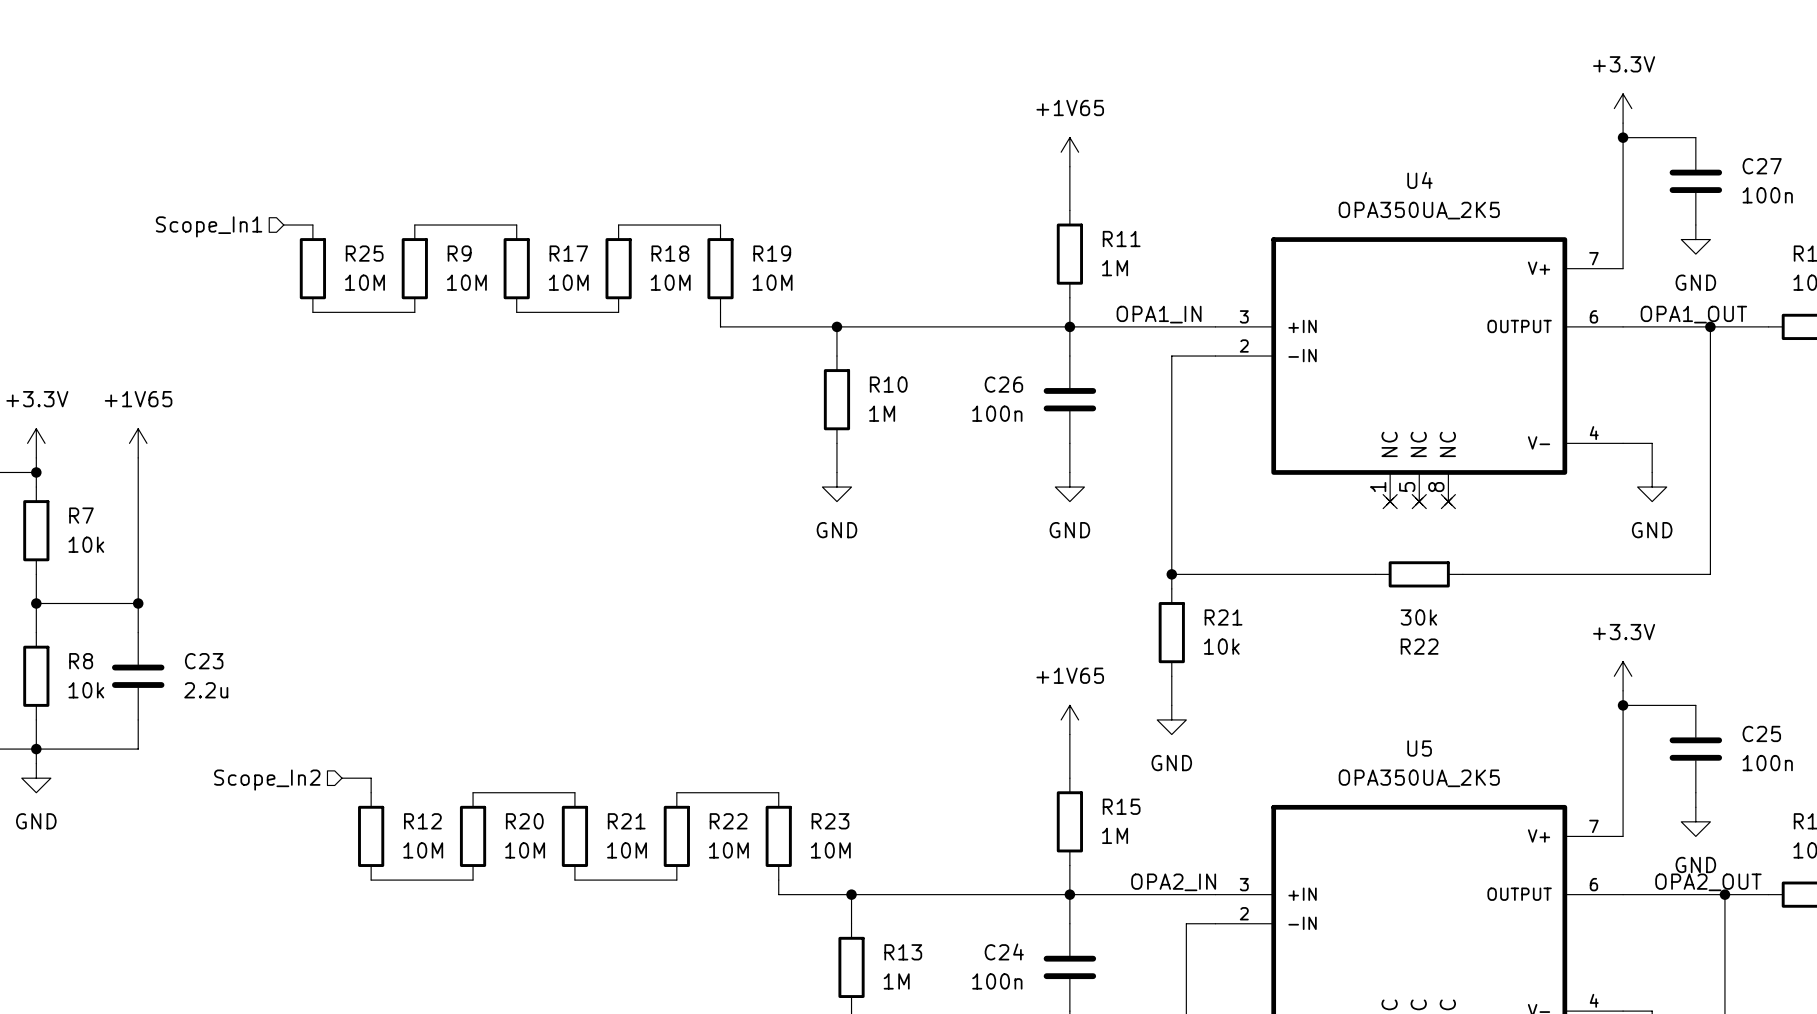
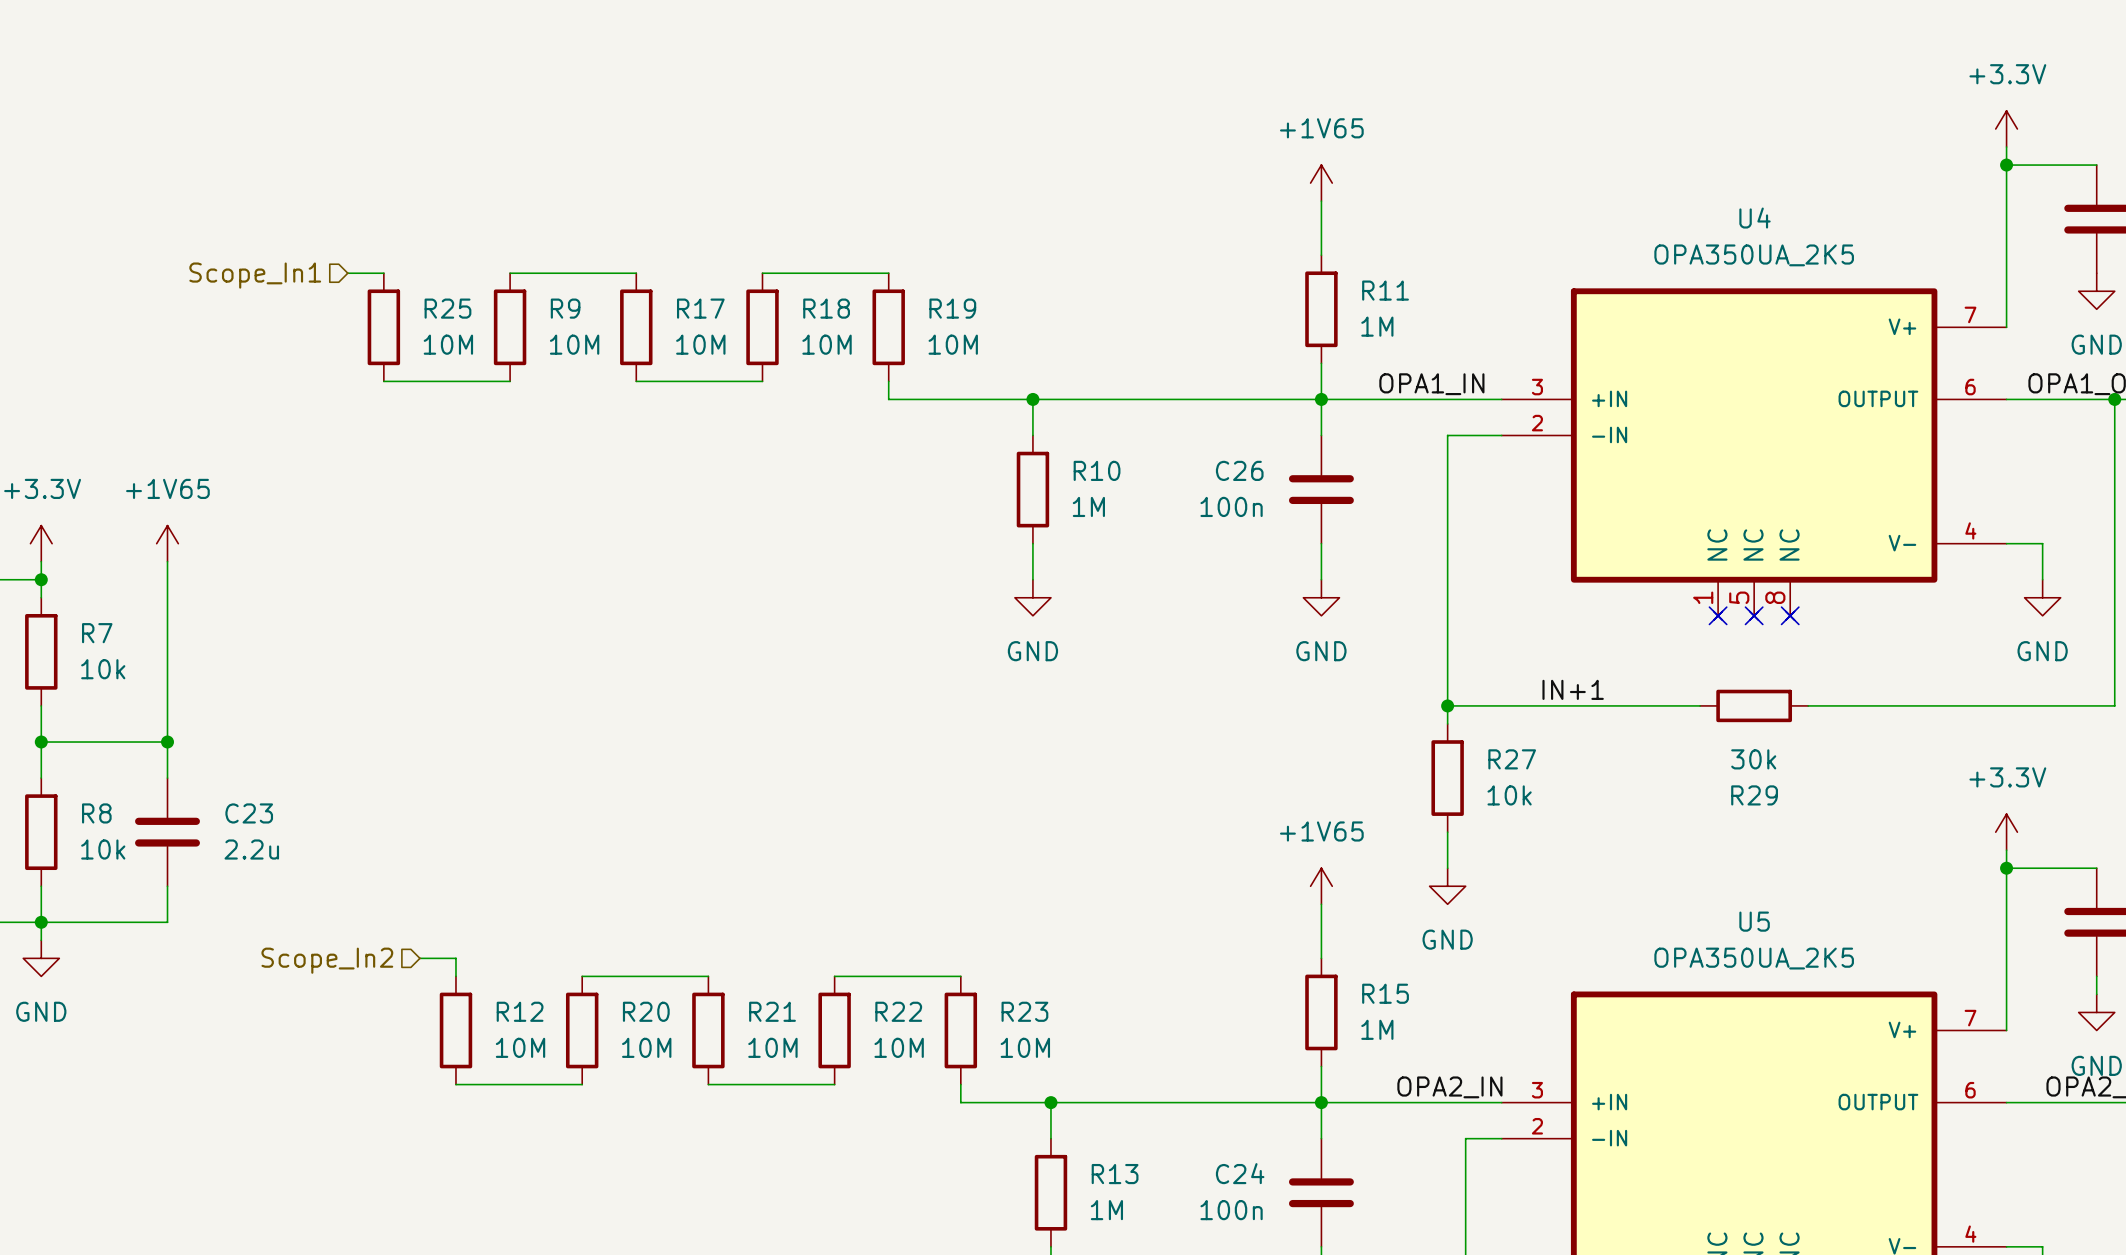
label: none -> IN+1 (1573, 689)
R21 name: R21 (1223, 617) -> R27 (1512, 759)
R22 name: R22 (1419, 646) -> R29 (1754, 795)

